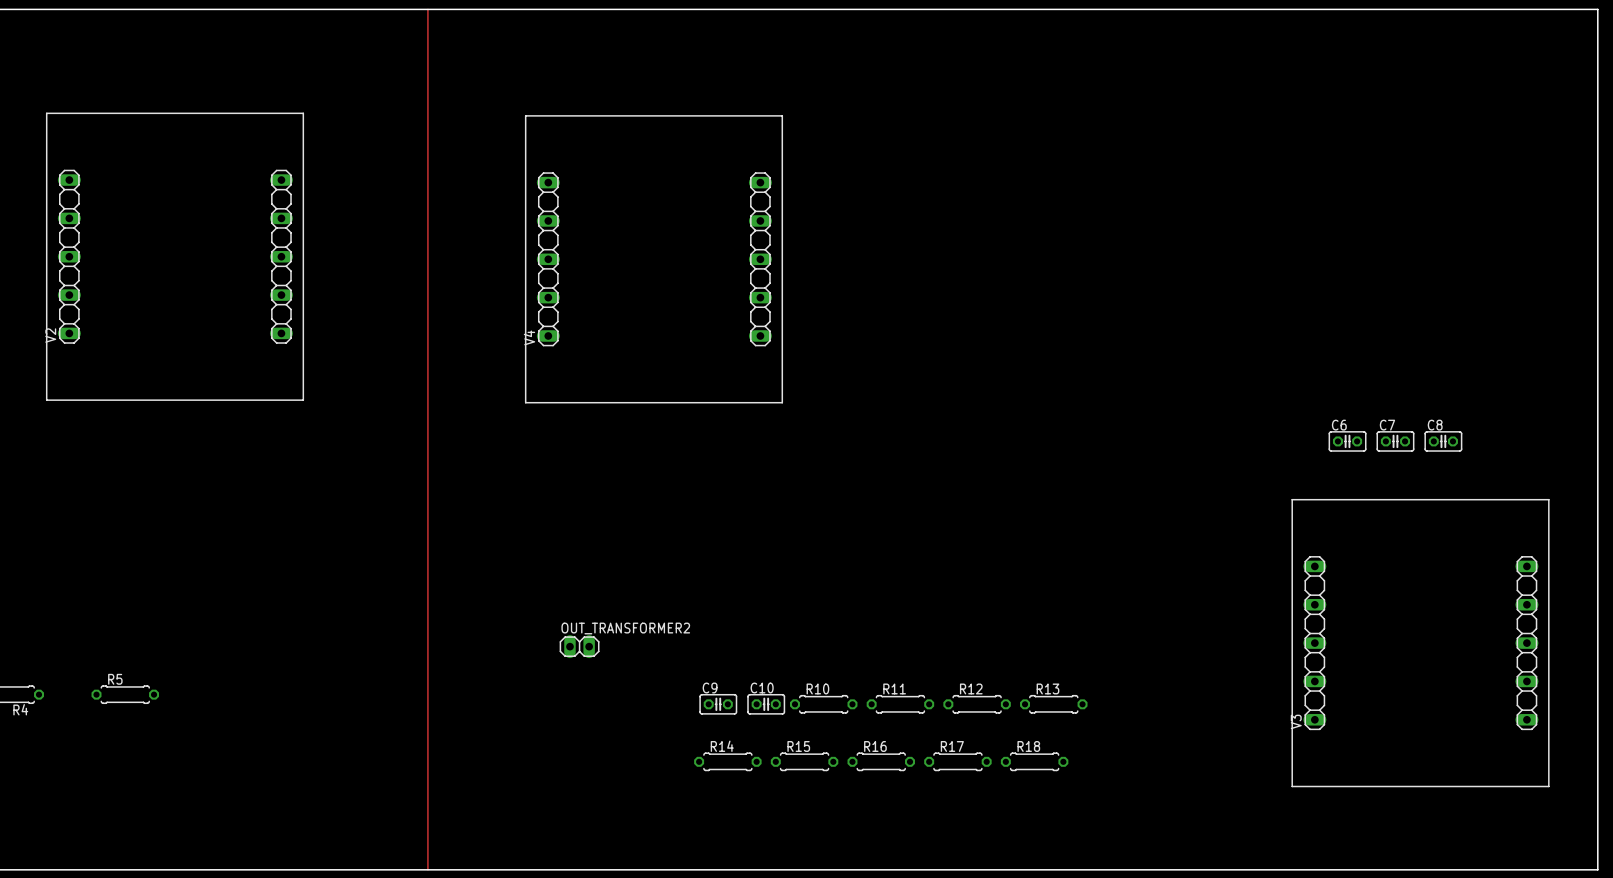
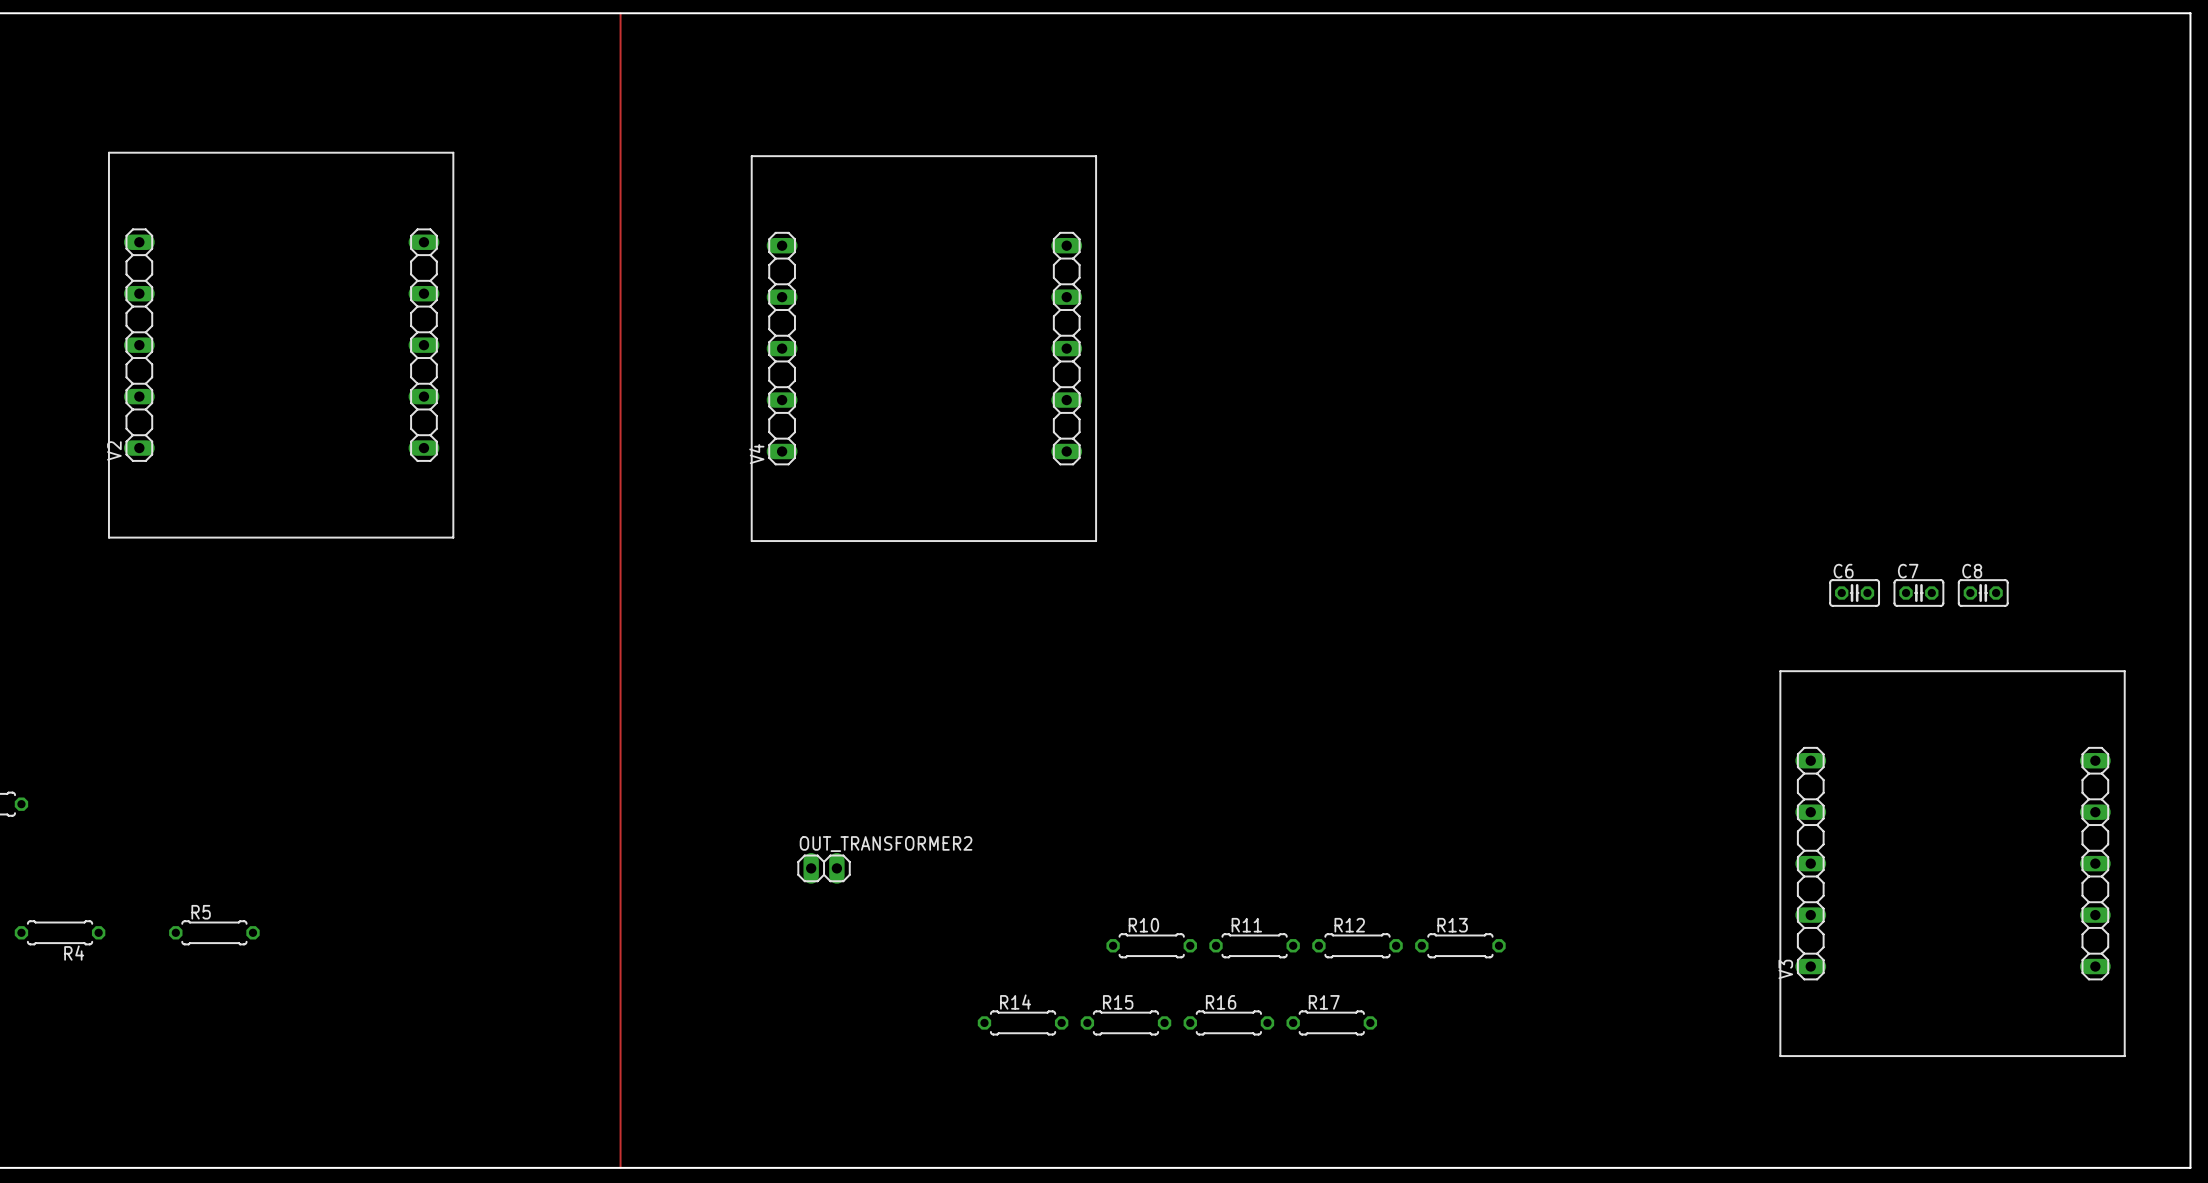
C9: (718, 704) -> none
C10: (766, 704) -> none
R18: (1034, 761) -> none

